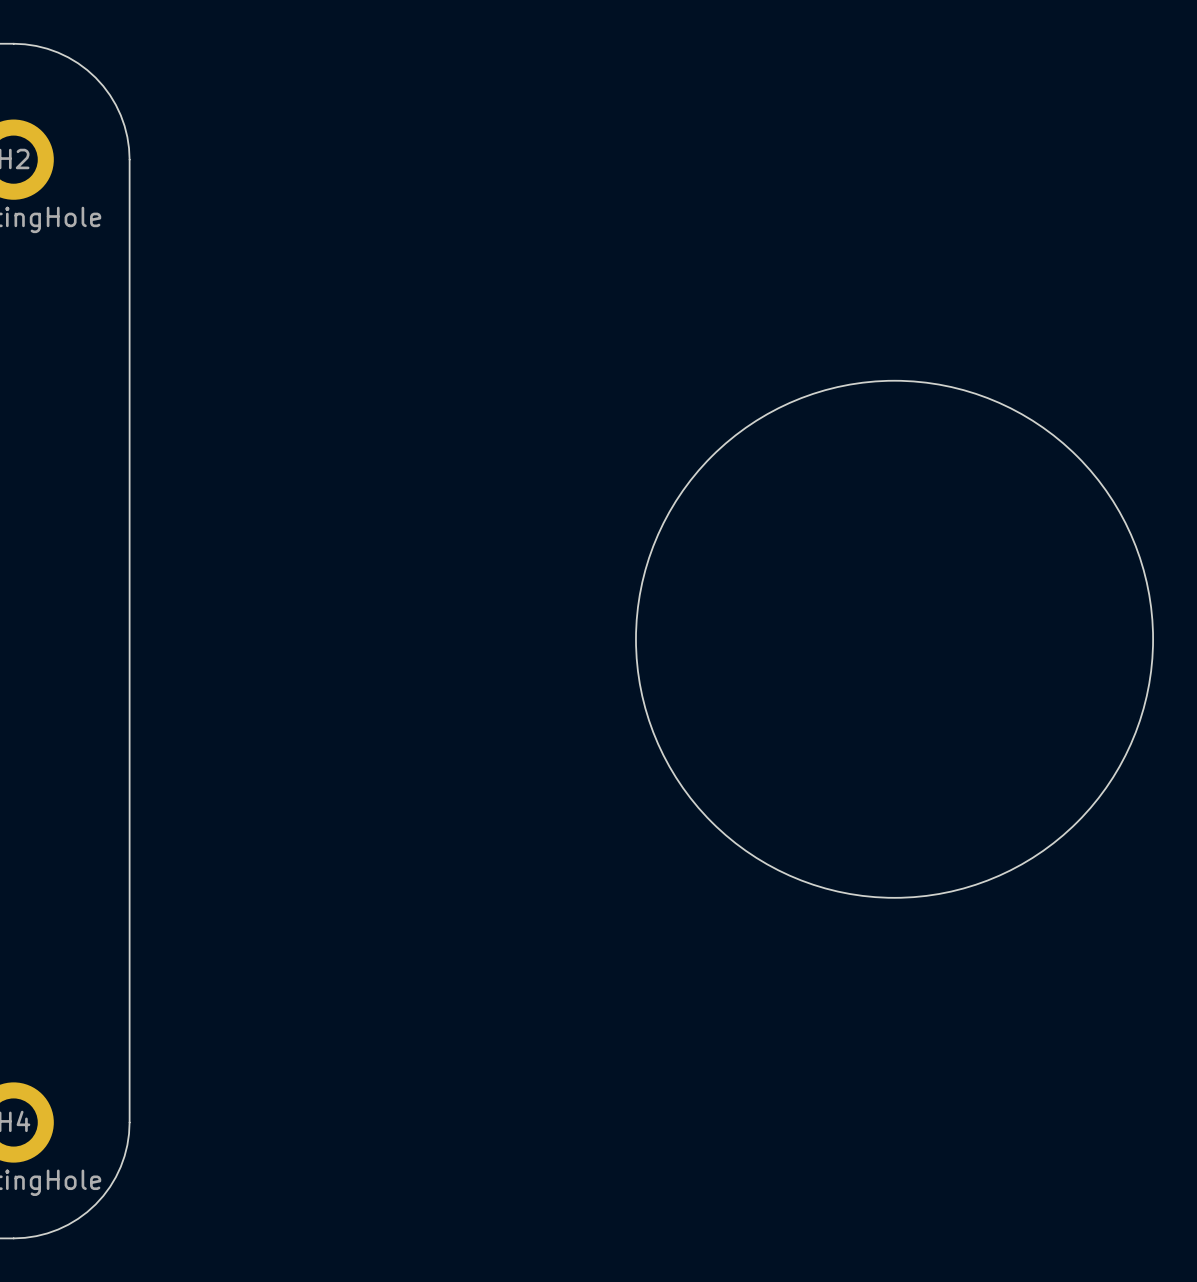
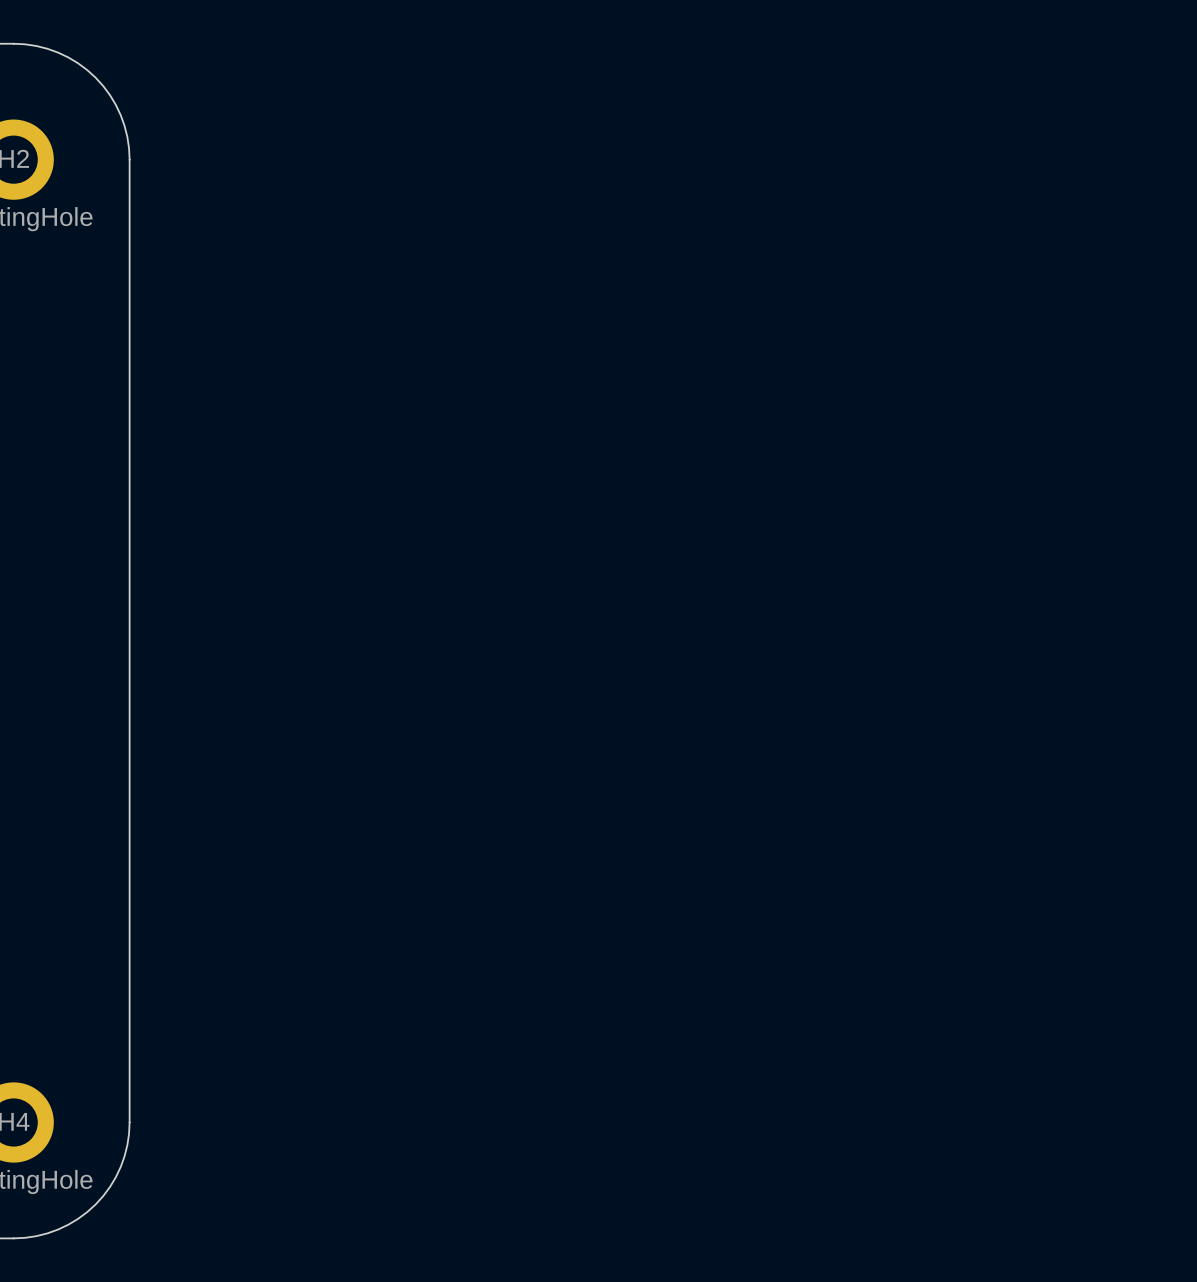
round board edge: [635, 379, 1154, 899] -> none

